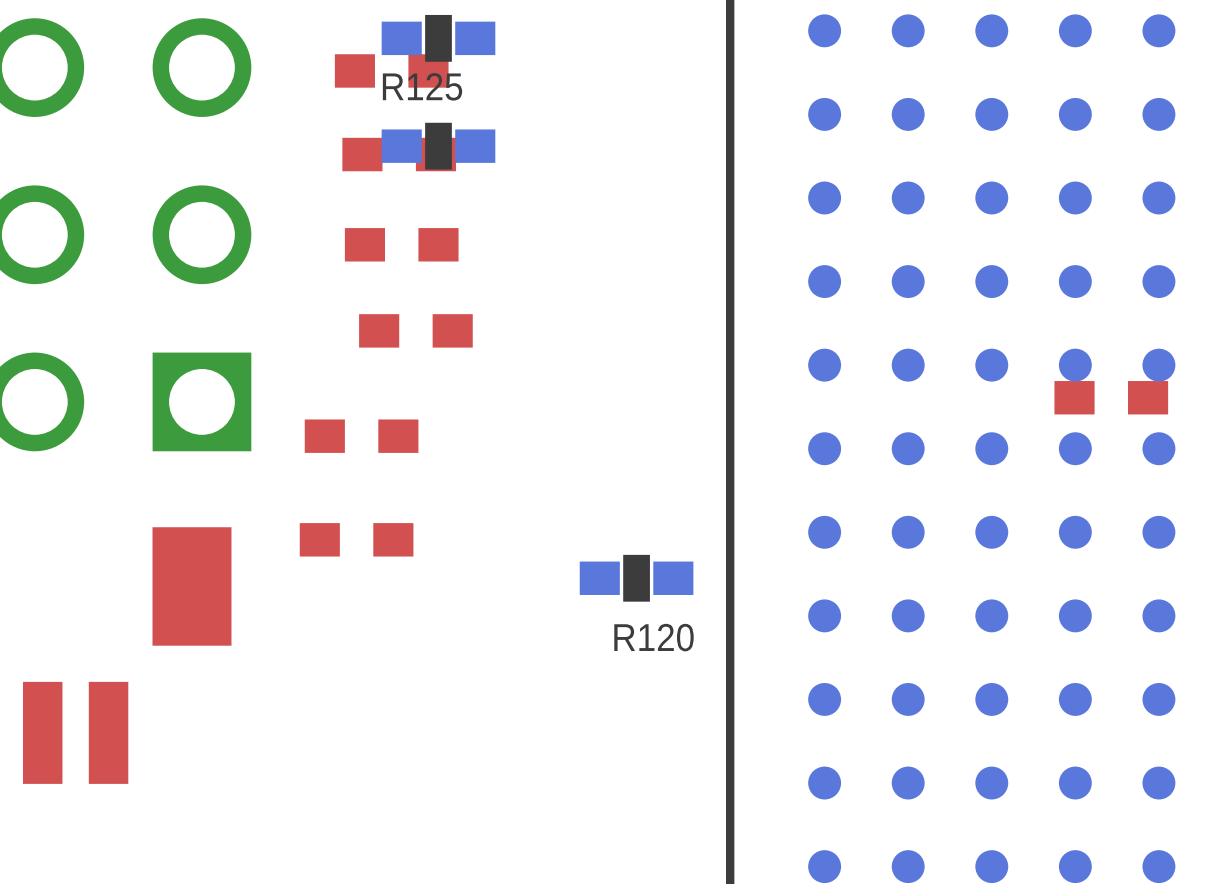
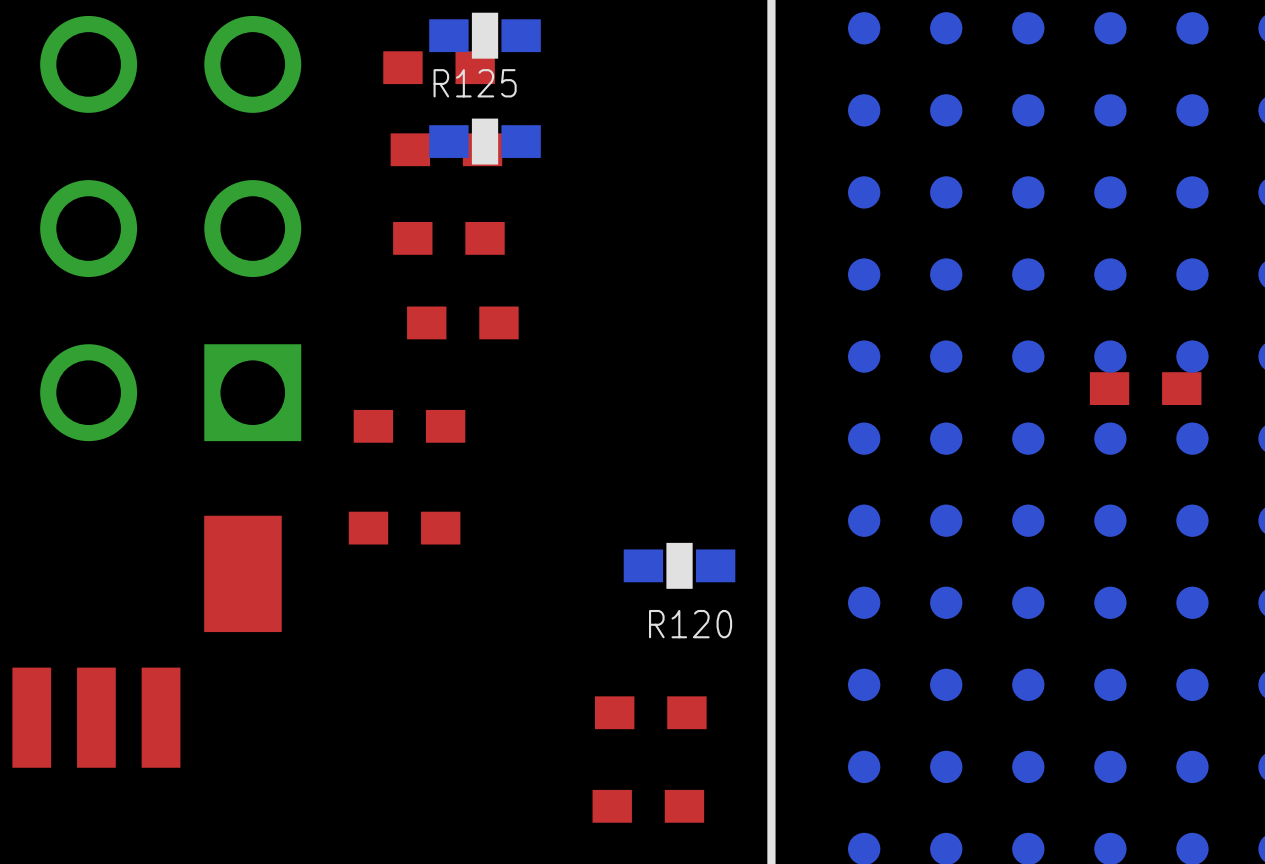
part: none -> (650, 712)
part: none -> (648, 806)

